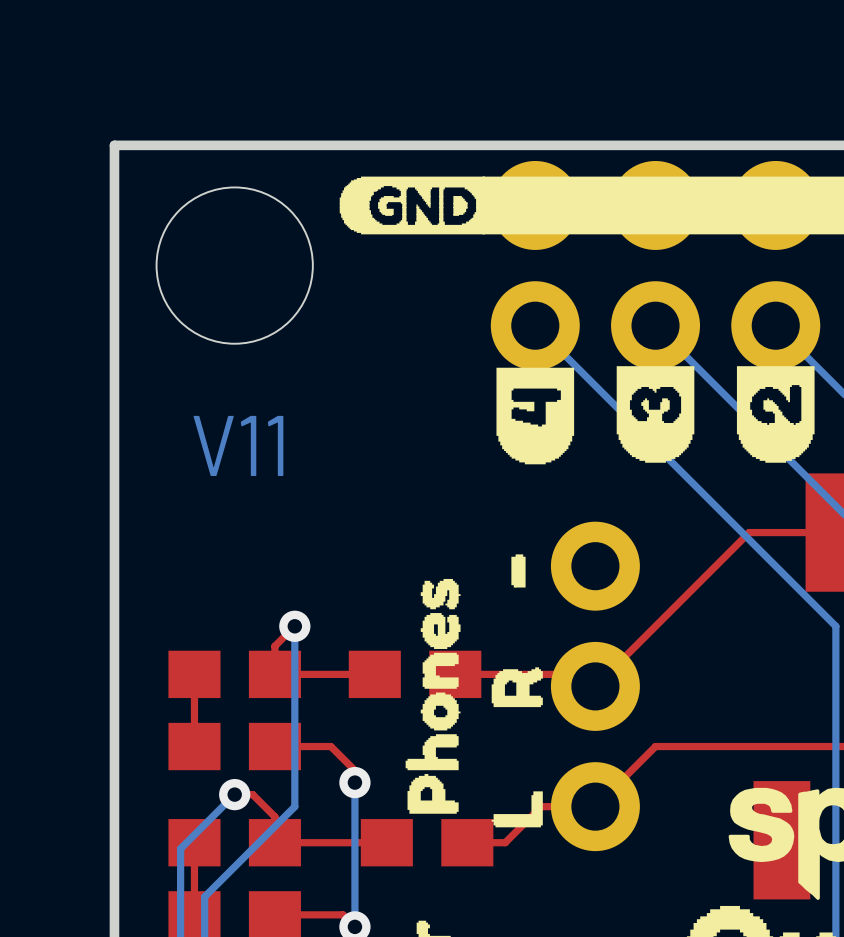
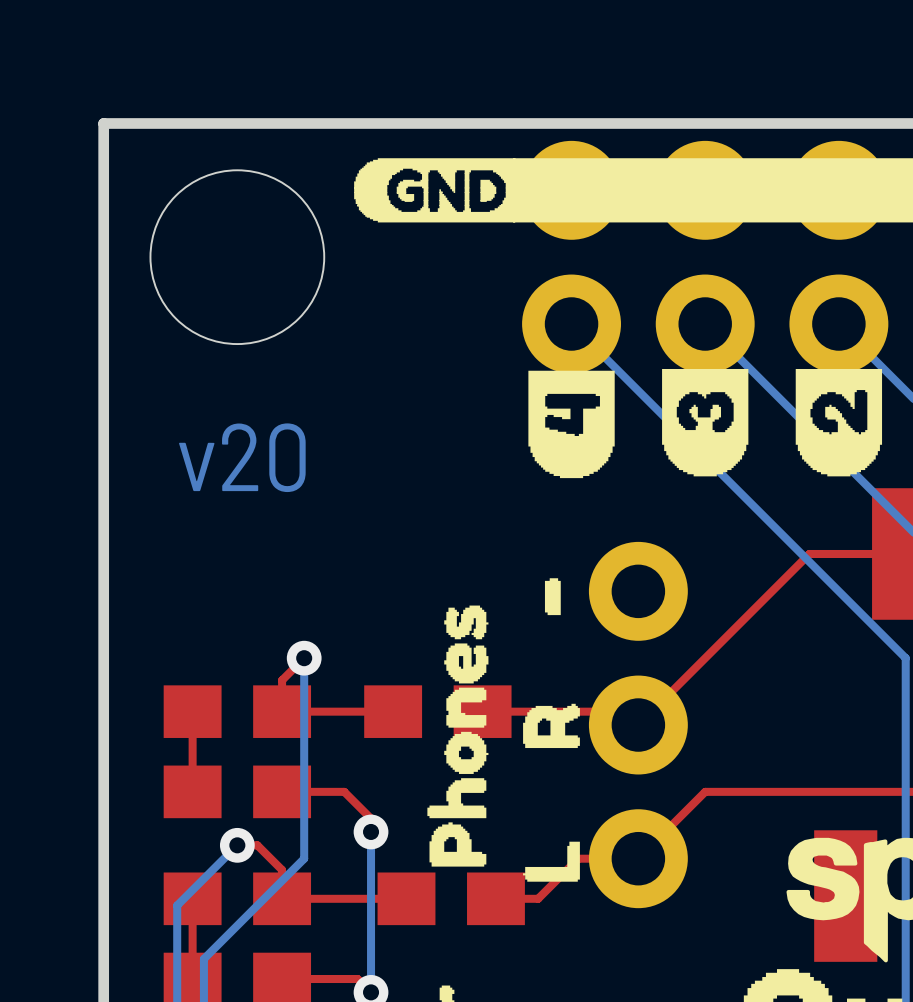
text: V11 (238, 445) -> v20 (242, 457)

